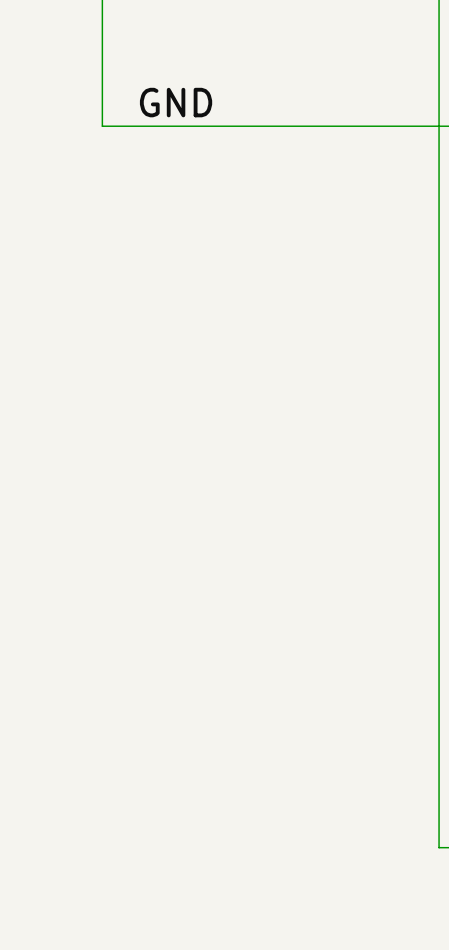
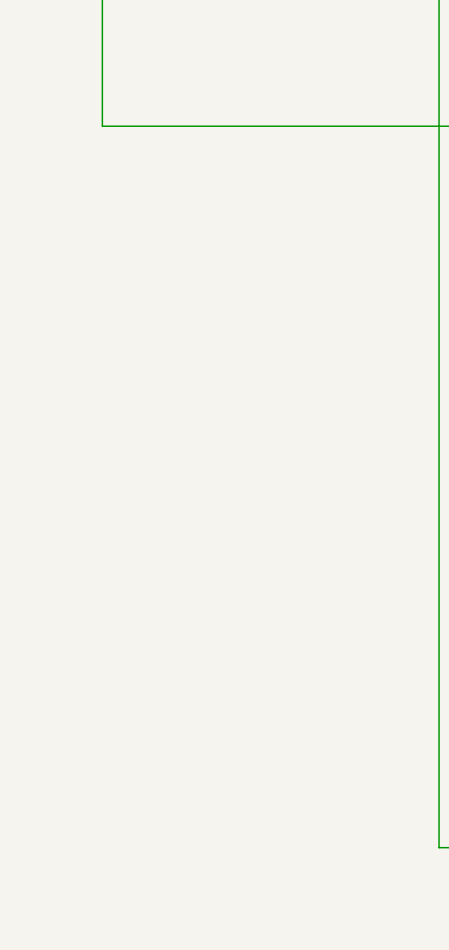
label: GND (176, 102) -> none

